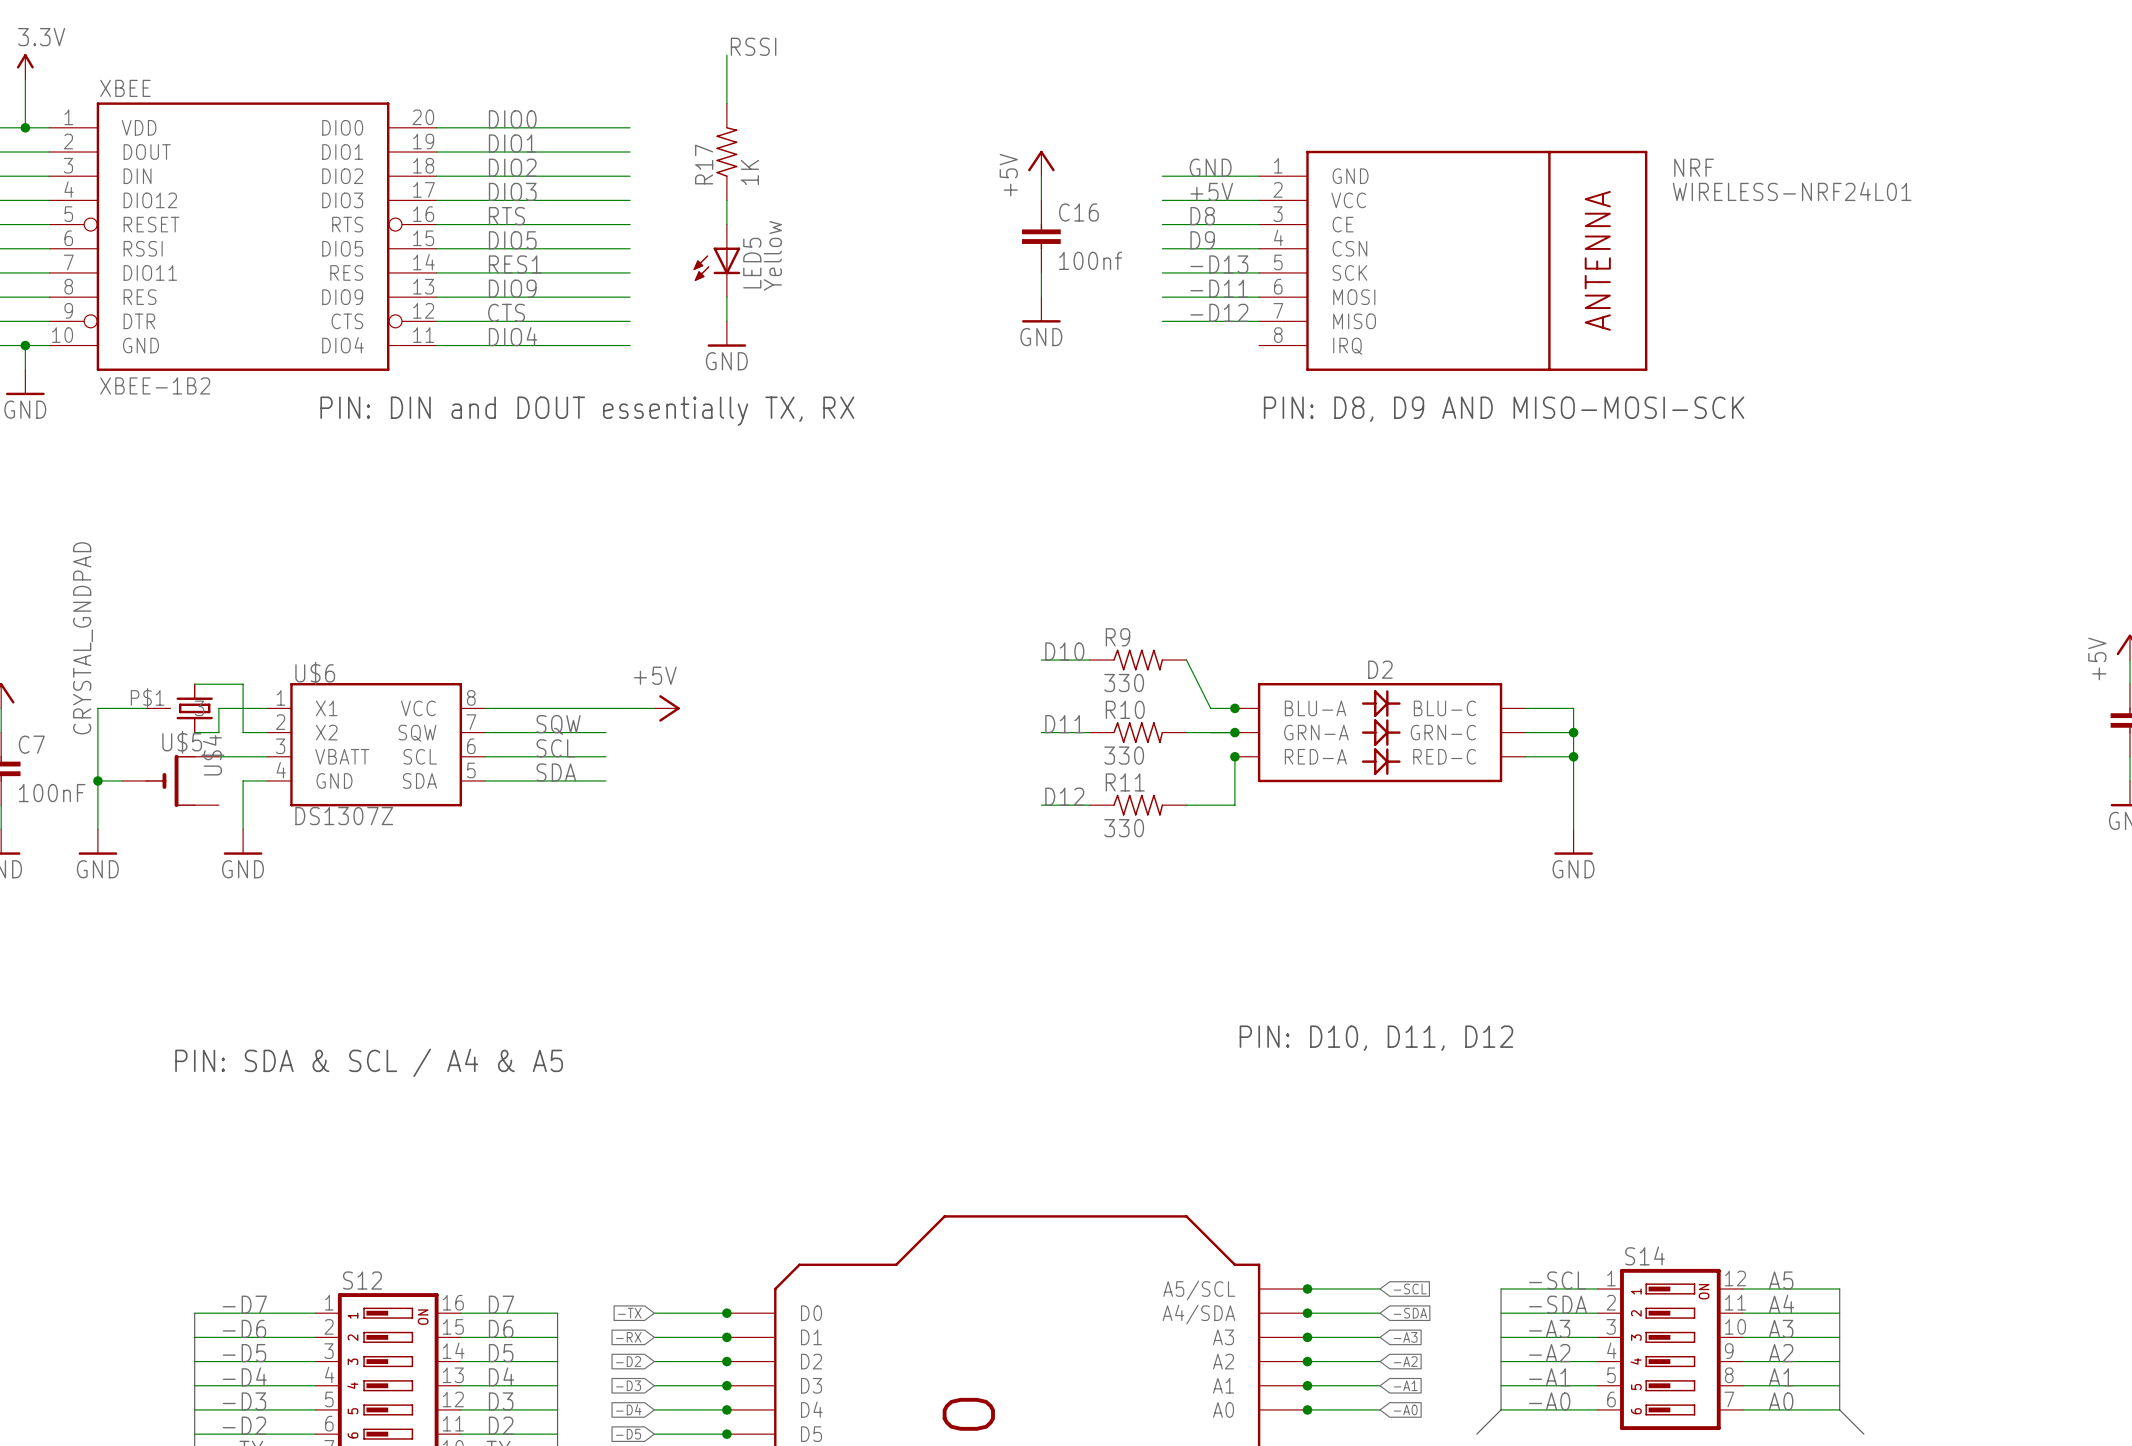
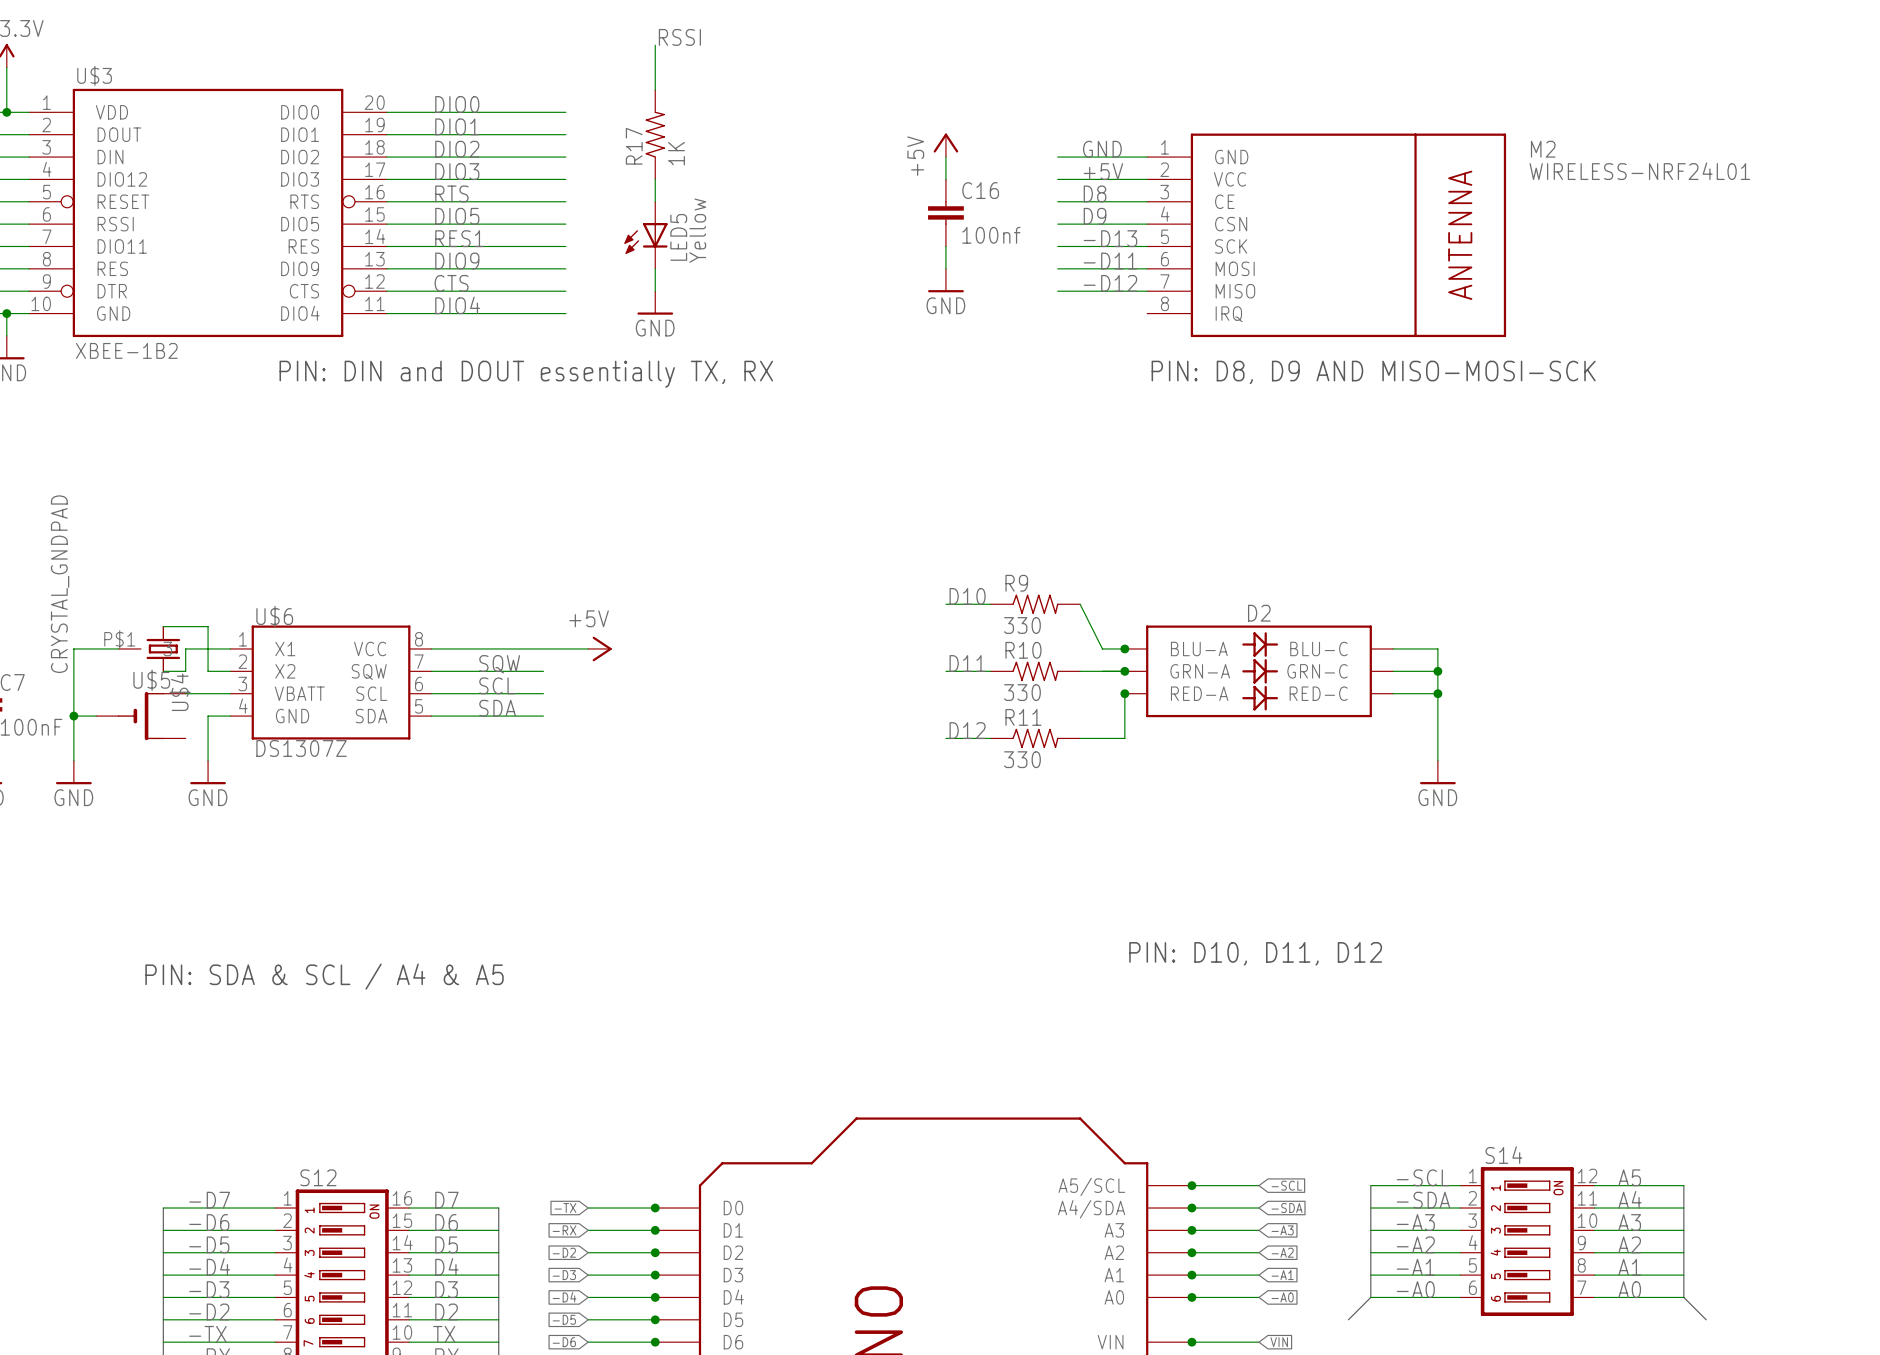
XBEE name: XBEE (125, 88) -> U$3 (94, 75)
NRF name: NRF (1694, 167) -> M2 (1543, 149)

